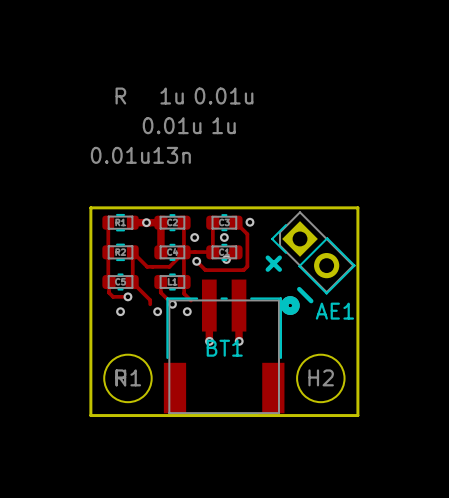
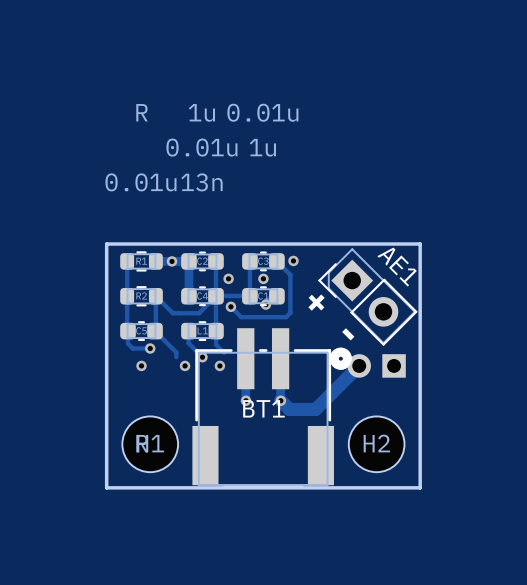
track: none -> (359, 365) (315, 409) (289, 409) (280, 400)
part: none -> (376, 365)
AE1 name rotation: 0° (334, 311) -> 45° clockwise (397, 267)
AE1 name position: AE1 (334, 311) -> AE1 (397, 267)

